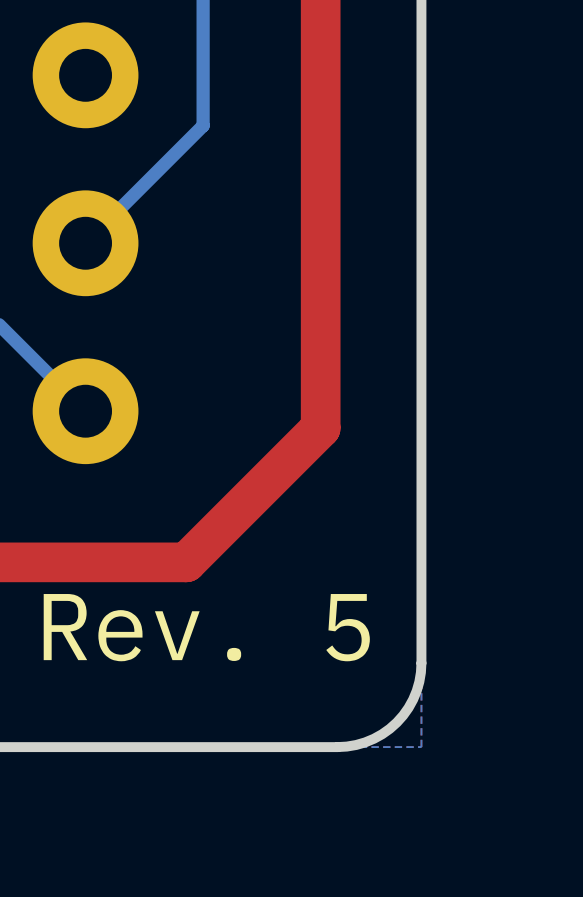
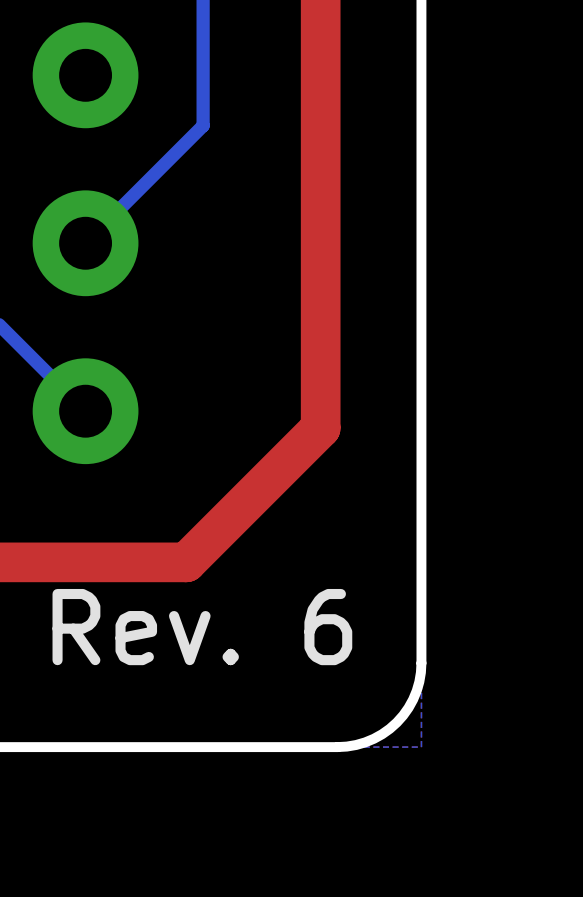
text: Rev. 5 (206, 627) -> Rev. 6 (202, 627)

